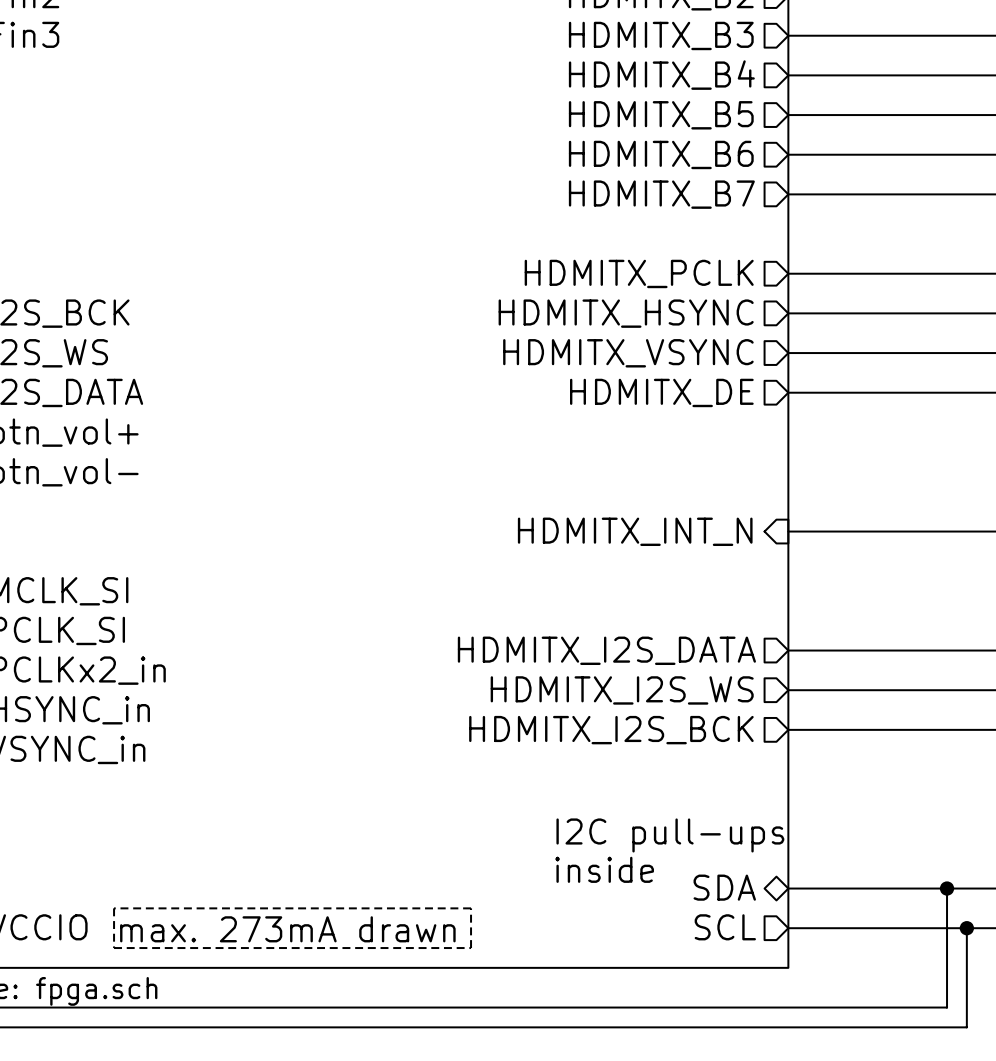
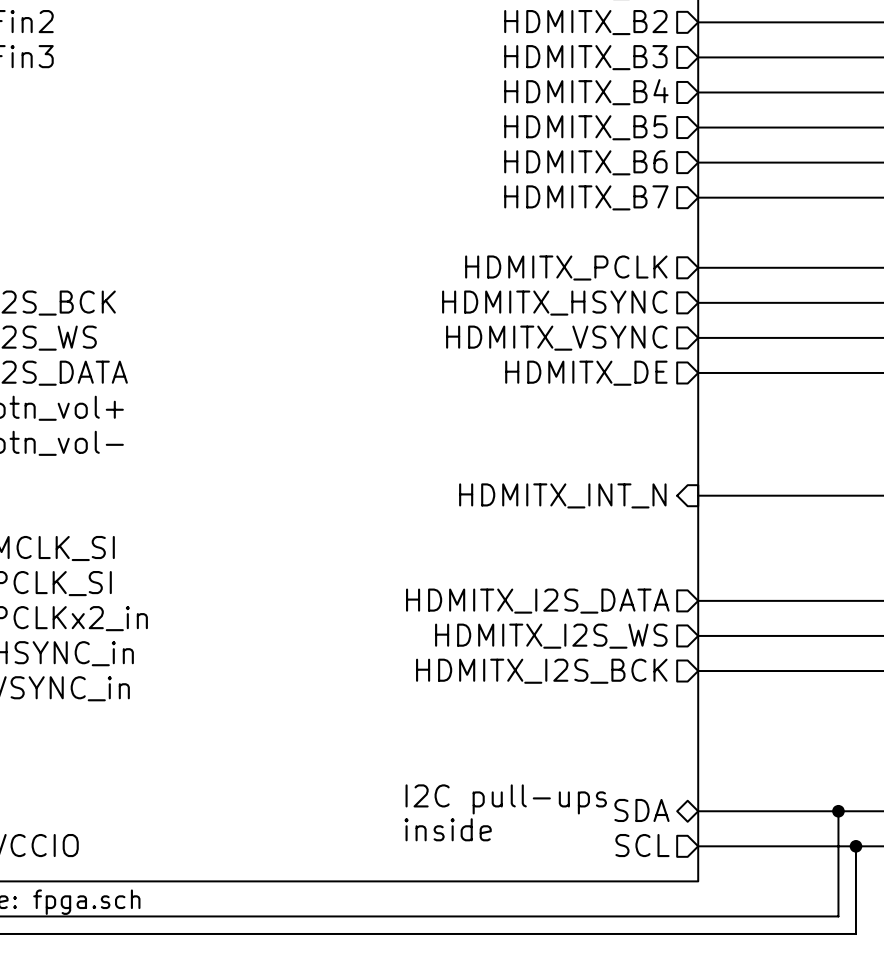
text position: I2C pull-ups (670, 835) -> I2C pull-ups (506, 799)
text position: inside (604, 869) -> inside (448, 829)
line: (114, 908) (114, 948) (471, 948) (471, 908) (114, 908) -> none
text: max. 273mA drawn (287, 929) -> none

